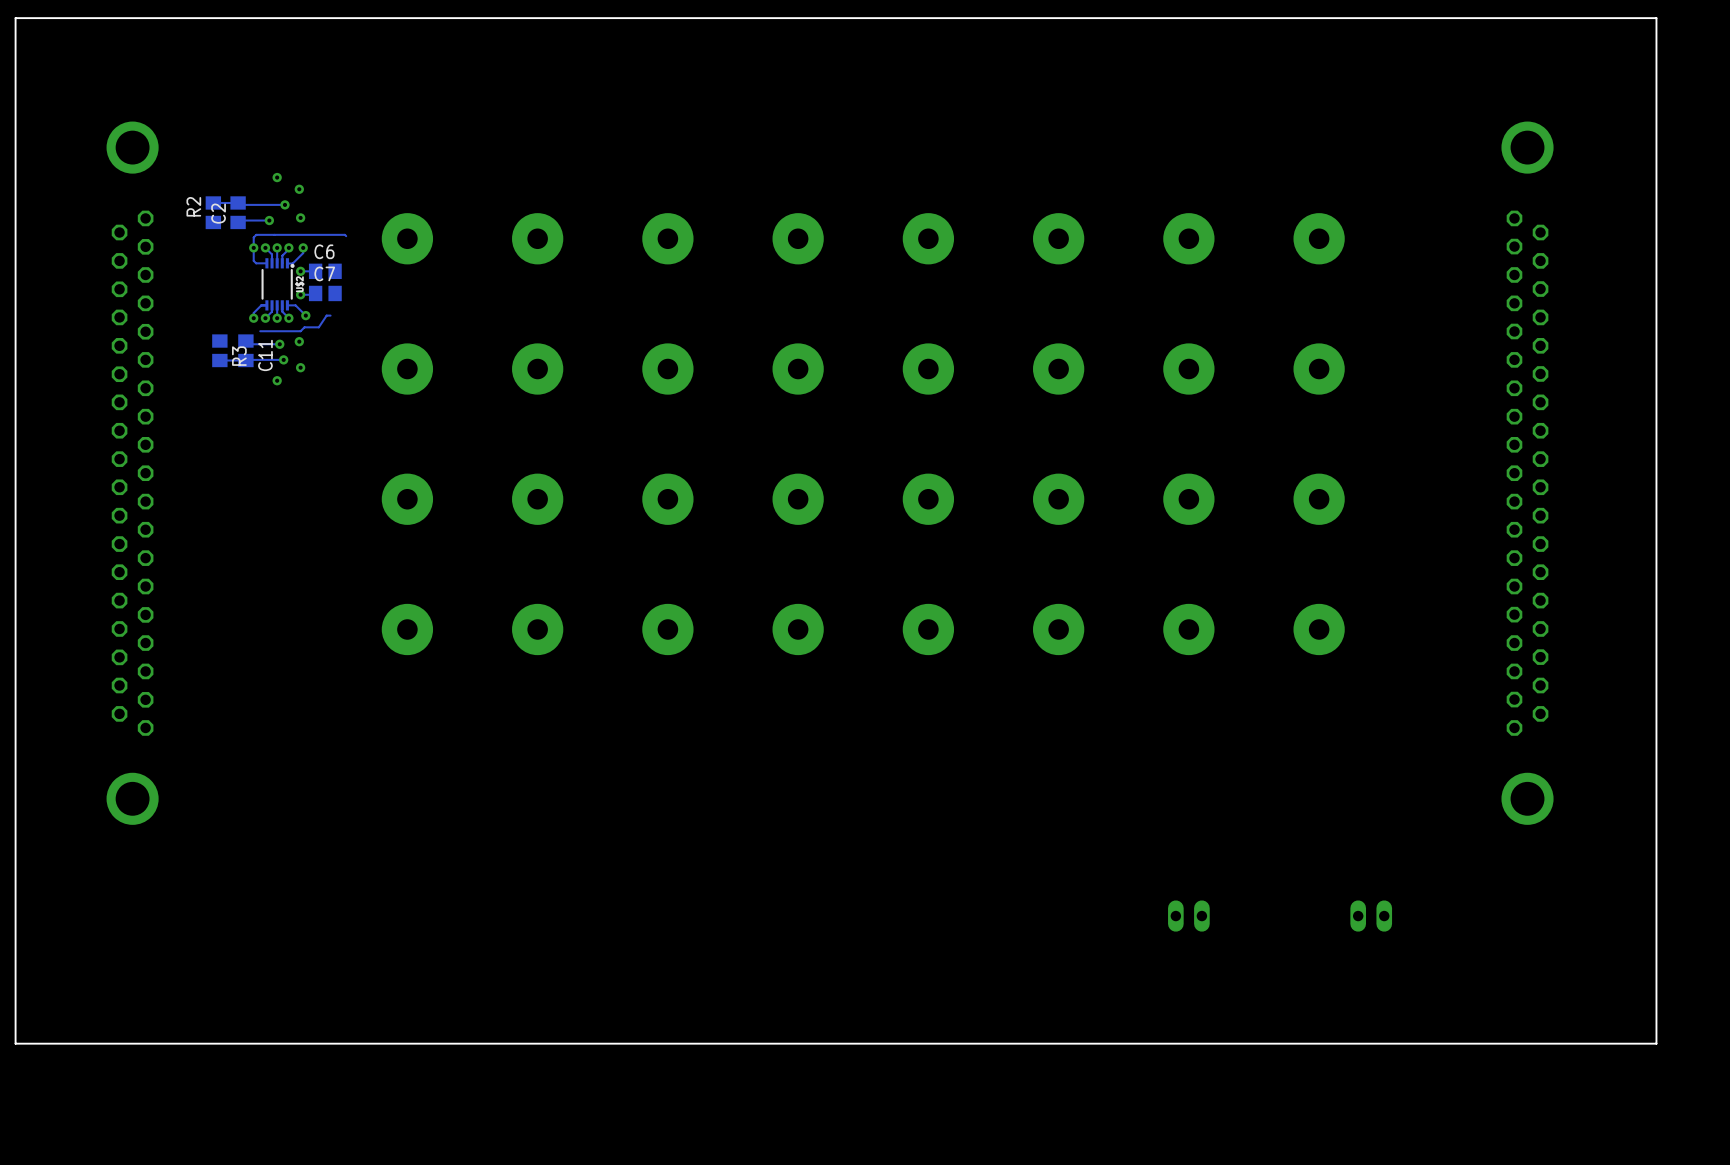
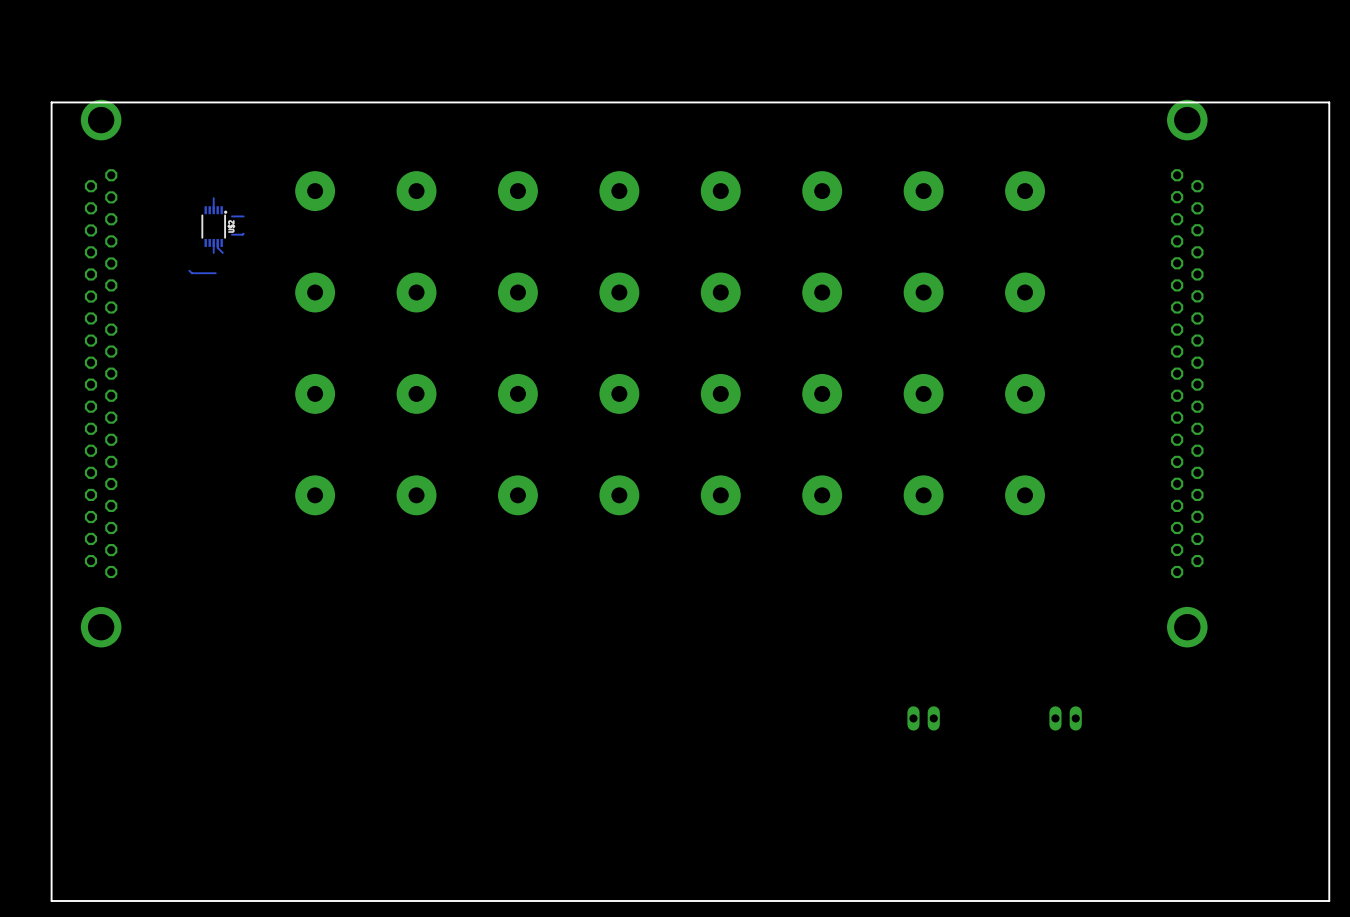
board edge: (1656, 18) (15, 18) (15, 1043) (1656, 1043) (1656, 18) -> (1329, 102) (51, 102) (51, 900) (1329, 900) (1329, 102)
via: (277, 177) -> none
via: (299, 189) -> none
track: (213, 202) (284, 204) -> none
via: (284, 204) -> none
R2: (213, 212) -> none
C2: (238, 212) -> none
via: (300, 217) -> none
track: (269, 220) (240, 220) (238, 222) -> none
via: (269, 220) -> none
track: (346, 236) (256, 234) (253, 237) (253, 260) (256, 263) (266, 263) -> none
via: (253, 247) -> none
track: (265, 247) (271, 254) (272, 263) -> none
via: (265, 247) -> none
via: (277, 247) -> none
track: (288, 247) (282, 255) (282, 263) -> none
via: (288, 247) -> none
track: (303, 247) (303, 253) (292, 263) (287, 263) -> none
via: (303, 247) -> none
via: (300, 271) -> none
C6: (325, 271) -> none
C7: (325, 293) -> none
via: (300, 294) -> none
track: (266, 305) (261, 305) (253, 313) (253, 318) -> none
track: (271, 305) (271, 311) (265, 318) -> none
track: (287, 305) (295, 305) (305, 315) -> none
via: (305, 315) -> none
track: (330, 315) (326, 315) (318, 327) (304, 327) (300, 331) (260, 331) -> none
via: (253, 318) -> none
via: (265, 318) -> none
via: (277, 318) -> none
via: (288, 318) -> none
via: (299, 341) -> none
via: (279, 344) -> none
R3: (219, 350) -> none
C11: (245, 350) -> none
track: (283, 359) (219, 360) -> none
via: (283, 359) -> none
via: (300, 367) -> none
via: (277, 380) -> none

